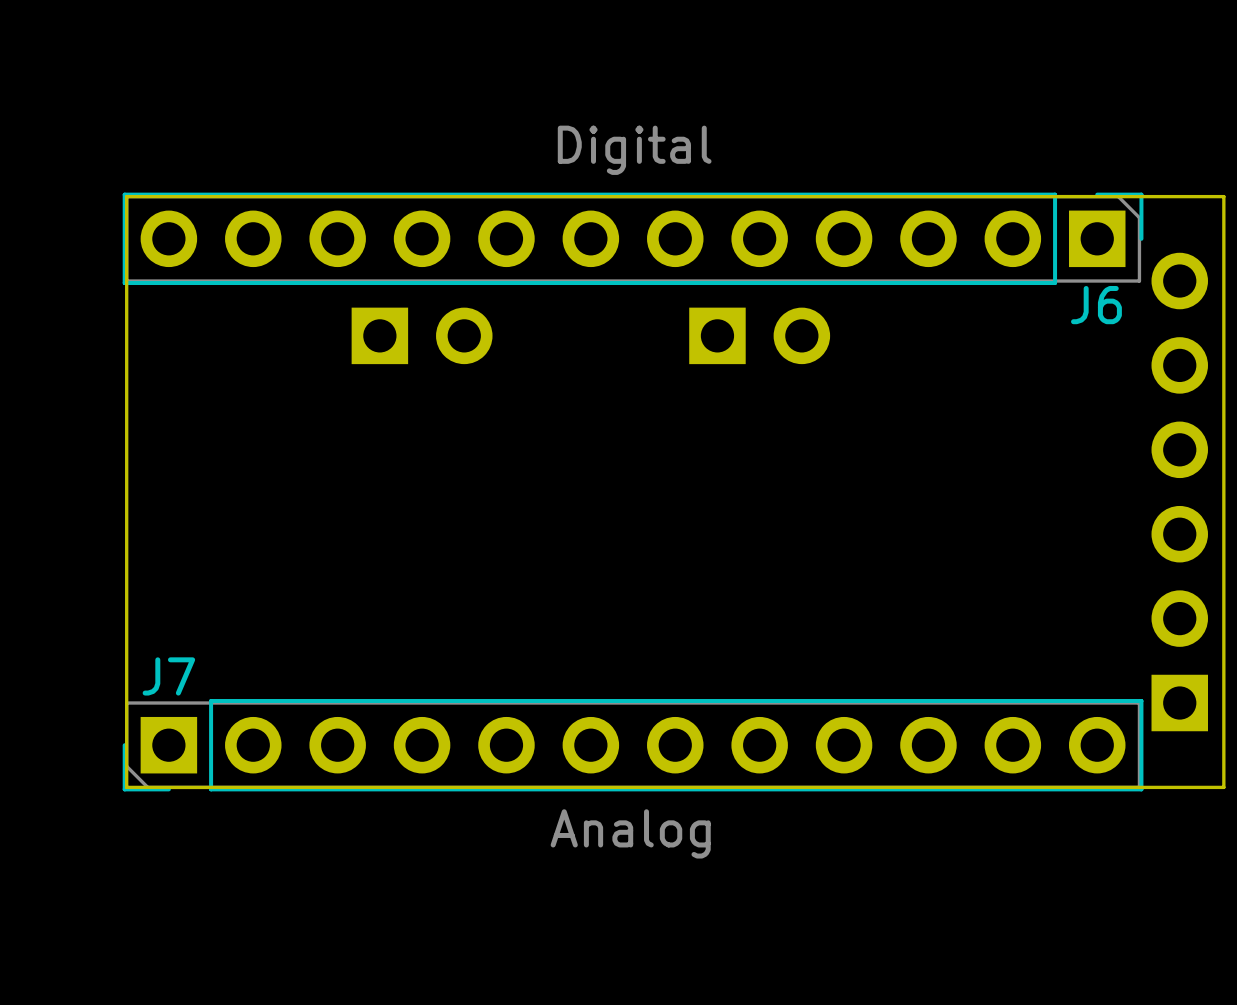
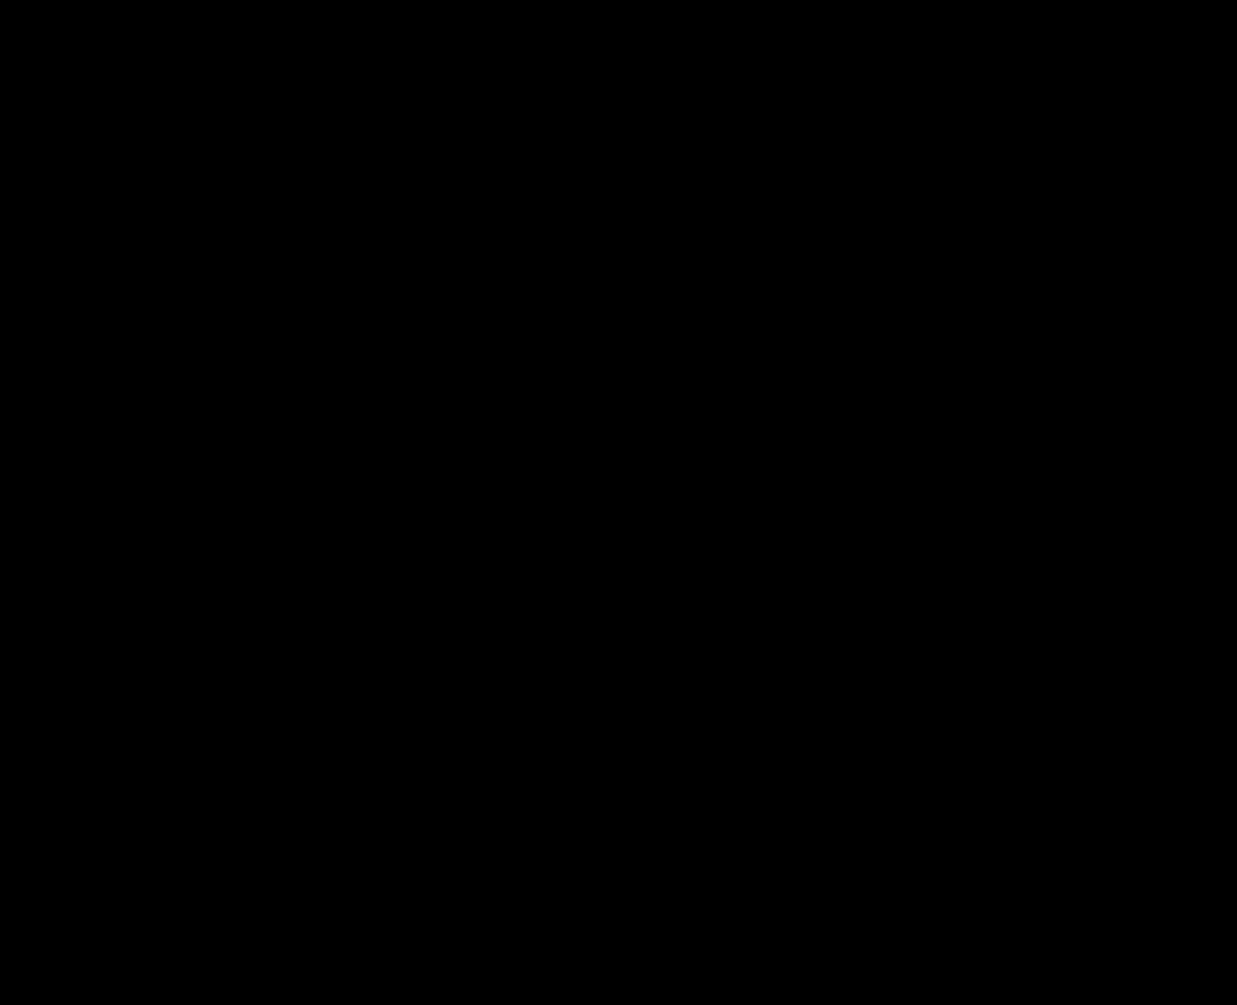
board edge: (1223, 196) (126, 196) (126, 787) (1223, 787) (1223, 196) -> none
J6: Digital (633, 238) -> none
part: (422, 335) -> none
part: (759, 335) -> none
part: (1179, 492) -> none
J7: Analog (633, 745) -> none

